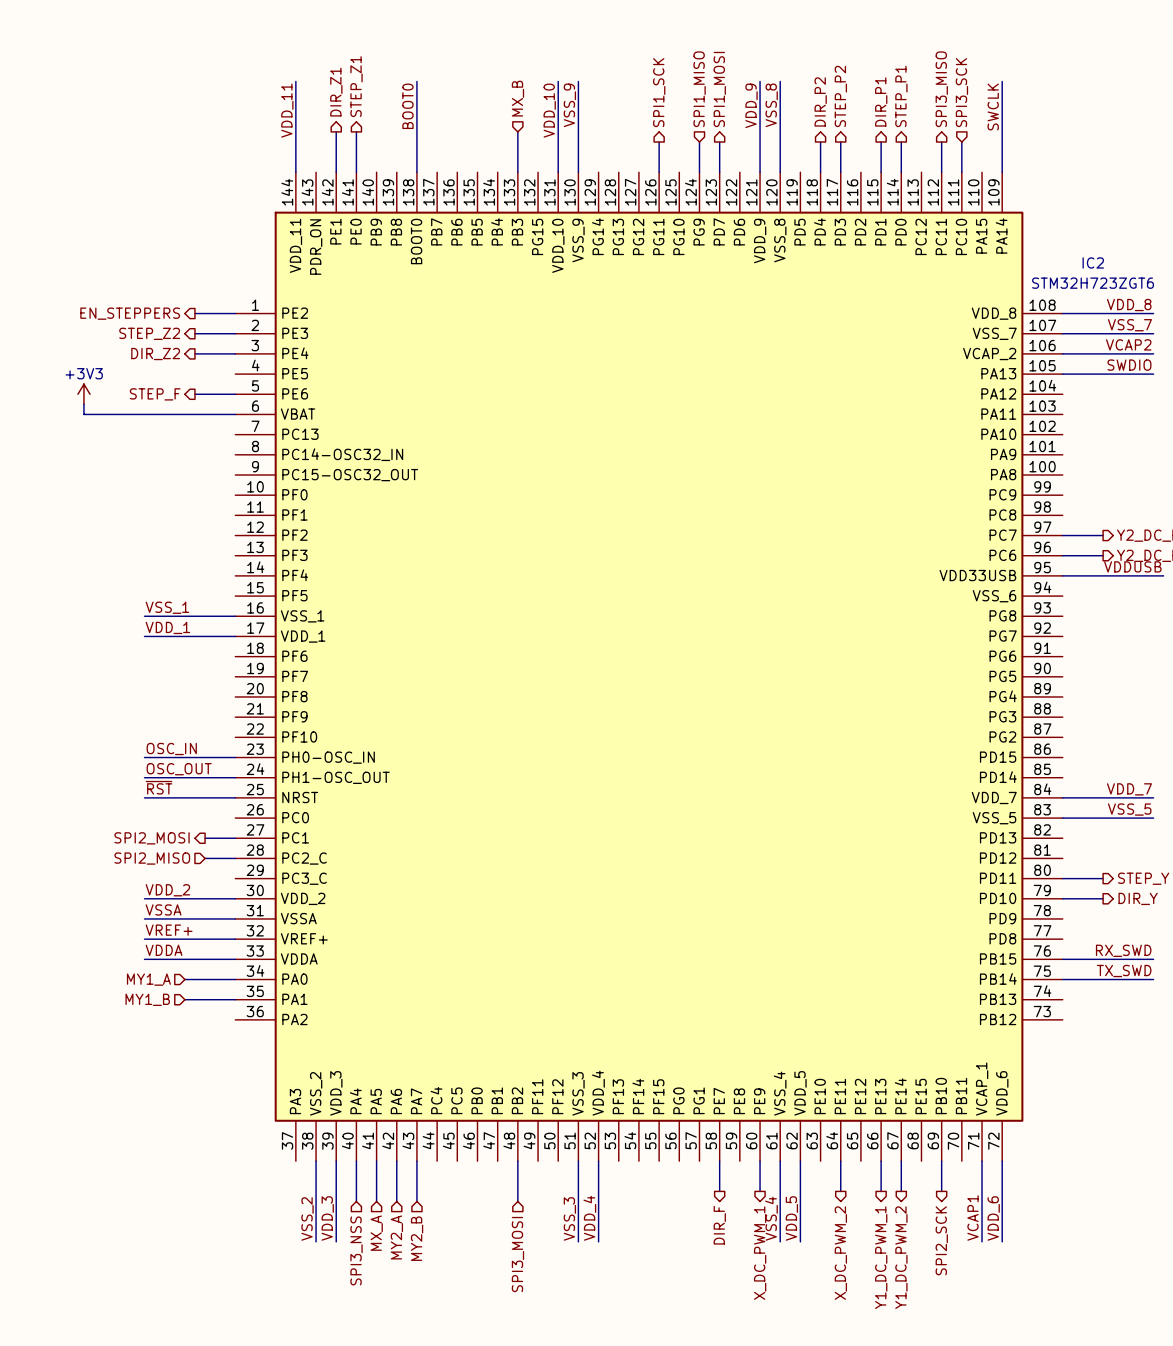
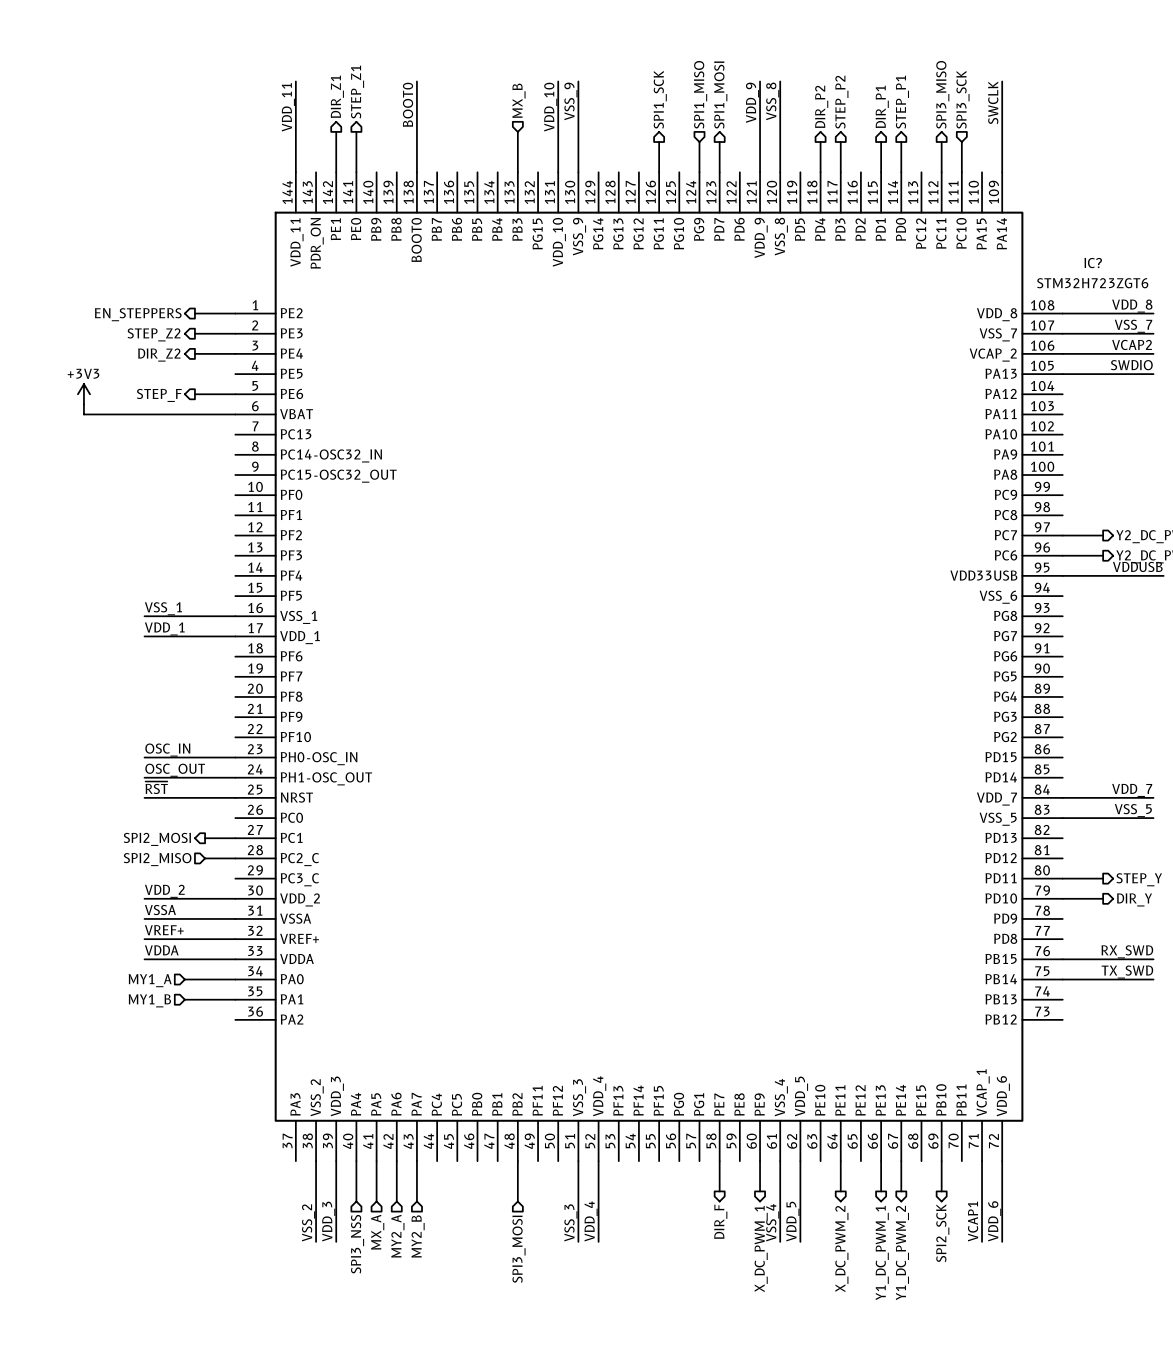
IC2 name: IC2 (1093, 262) -> IC? (1093, 263)

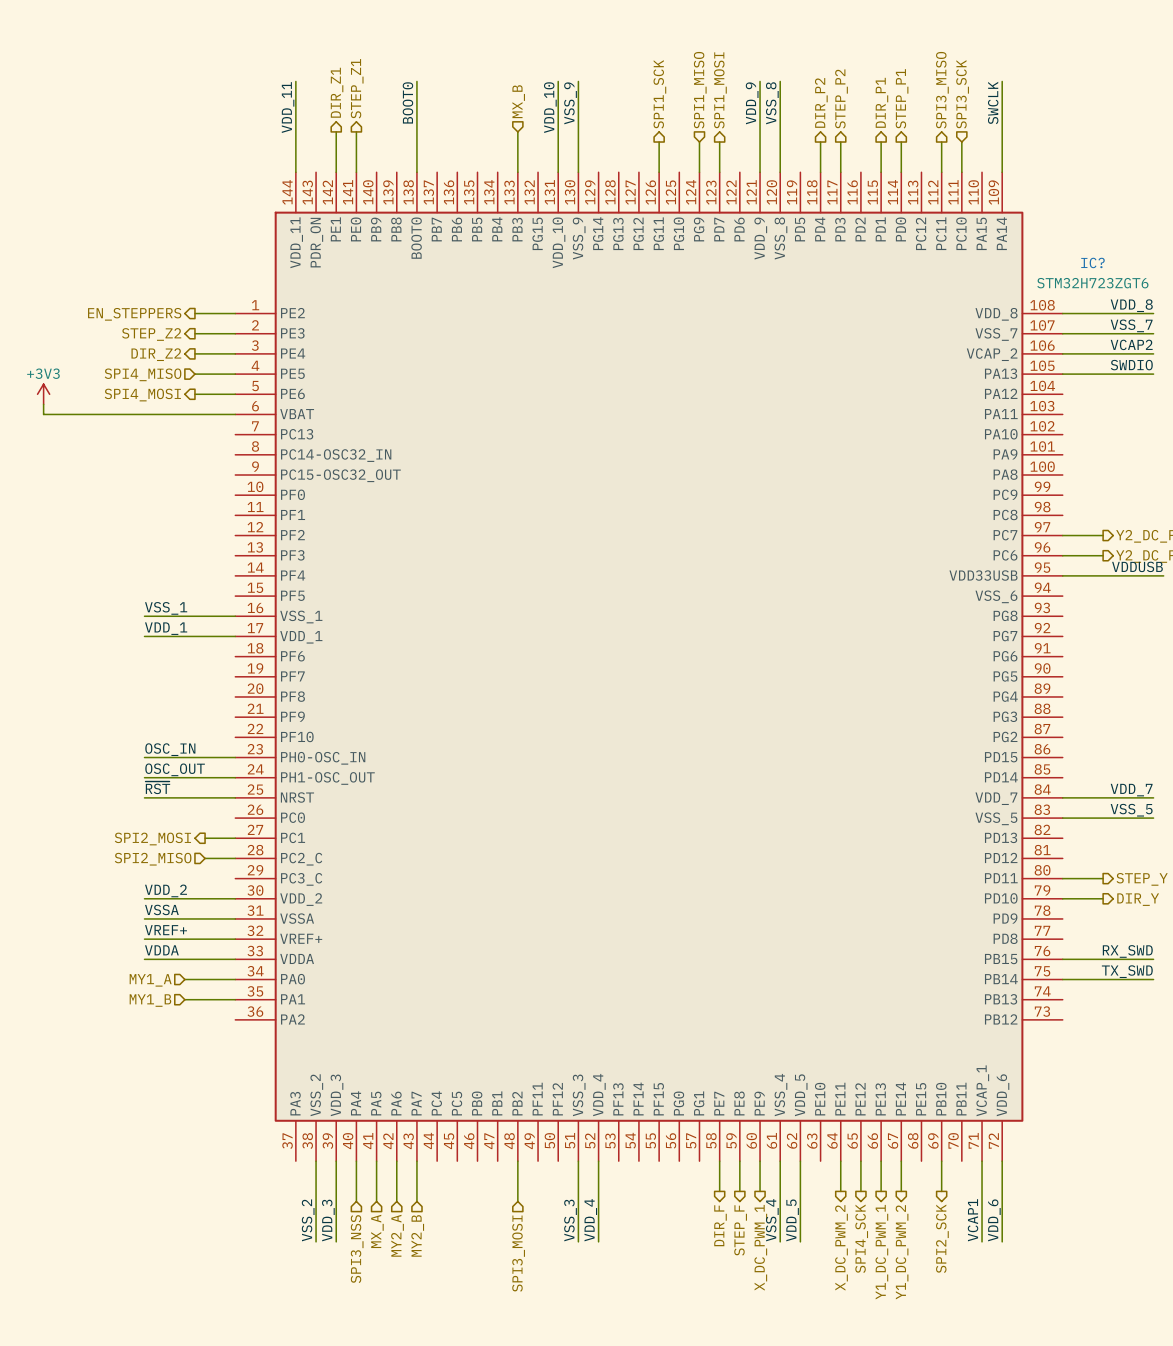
wire: none -> (194, 374) (235, 374)
hierarchical label: none -> SPI4_MISO (143, 374)
power symbol position: +3V3 (83, 394) -> +3V3 (43, 394)
hierarchical label: STEP_F (159, 395) -> SPI4_MOSI (142, 395)
wire: (83, 404) (83, 414) -> (43, 404) (43, 414) (83, 414)
wire: none -> (739, 1161) (739, 1191)
wire: none -> (860, 1161) (860, 1191)
hierarchical label: none -> STEP_F (740, 1230)
hierarchical label: none -> SPI4_SCK (861, 1238)

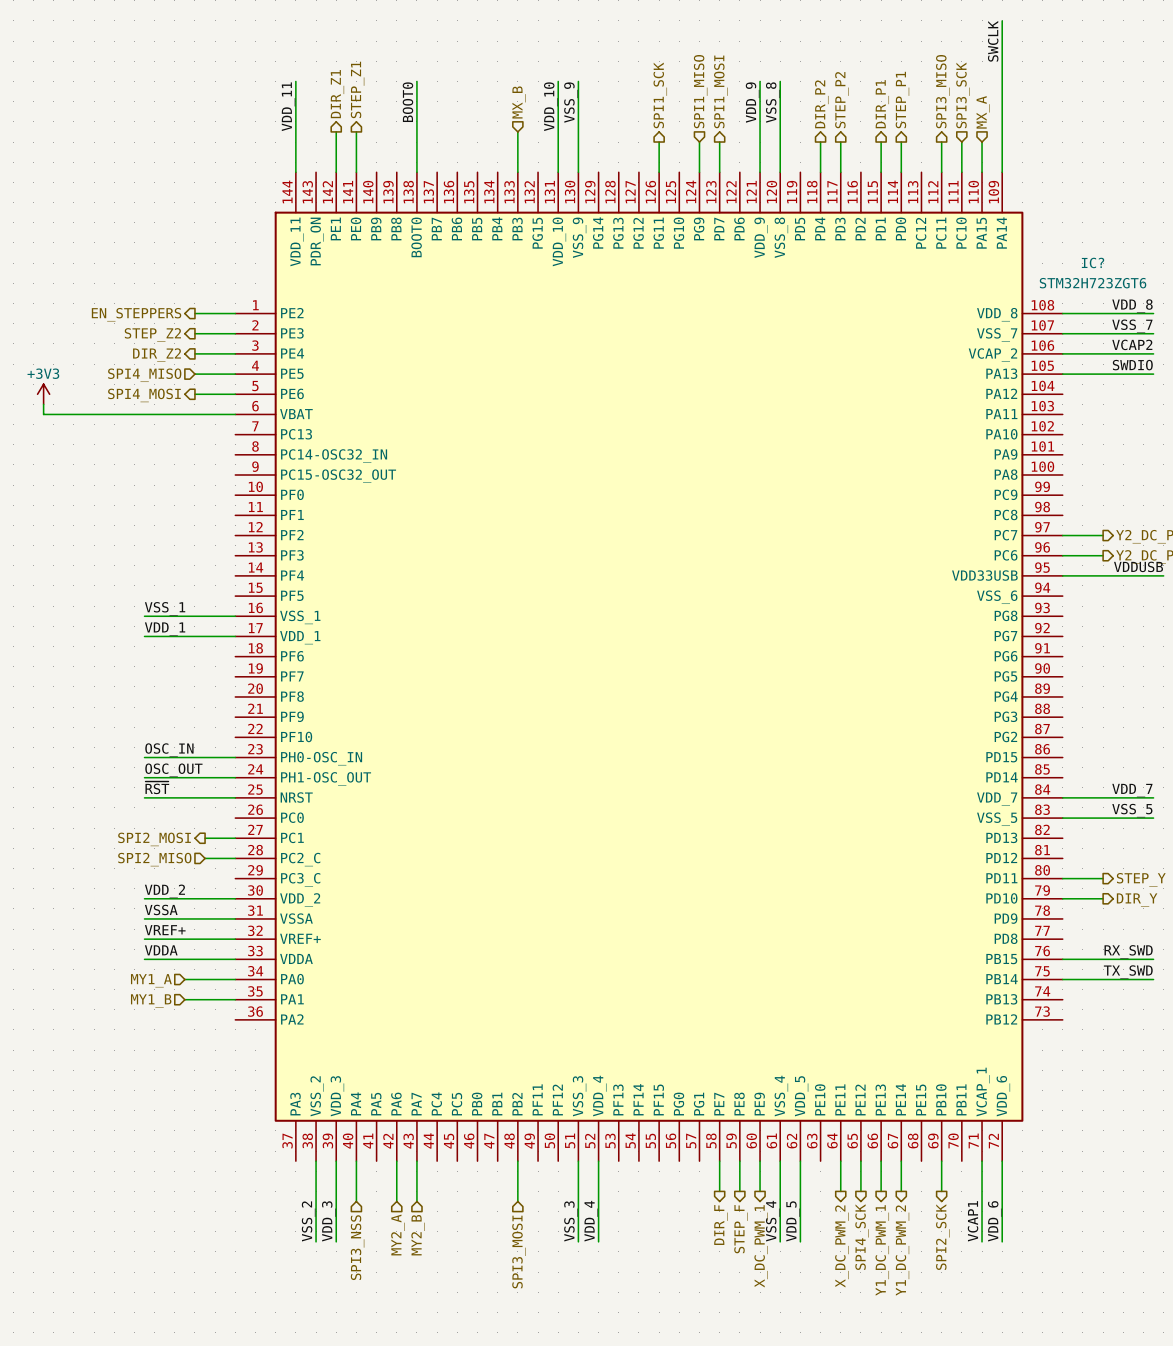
wire: none -> (1002, 20) (1002, 81)
label position: SWCLK (993, 102) -> SWCLK (993, 41)
hierarchical label: none -> MX_A (983, 112)
wire: none -> (982, 142) (982, 172)
wire: (376, 1161) (376, 1201) -> none
hierarchical label: MX_A (377, 1231) -> none

